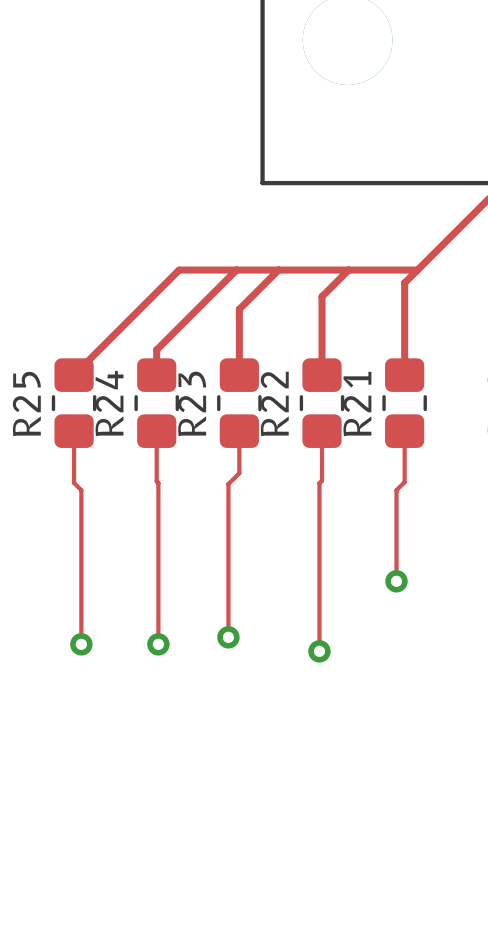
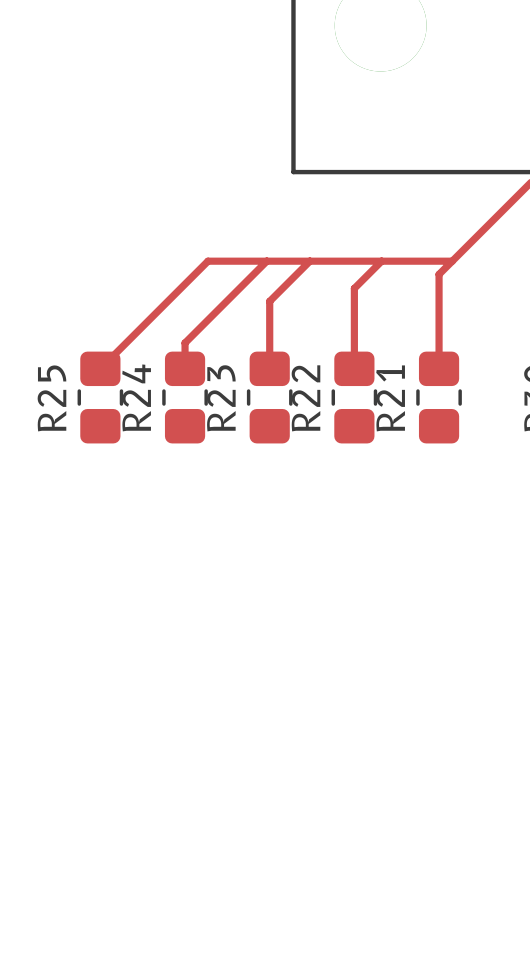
top track: (74, 431) (74, 482) (81, 490) (81, 644) -> none
top track: (156, 431) (158, 644) -> none
top track: (239, 431) (239, 473) (228, 484) (228, 637) -> none
top track: (322, 431) (322, 480) (319, 483) (319, 651) -> none
top track: (404, 431) (404, 482) (396, 490) (396, 581) -> none
via: (396, 581) -> none
via: (228, 637) -> none
via: (81, 644) -> none
via: (158, 644) -> none
via: (319, 651) -> none

